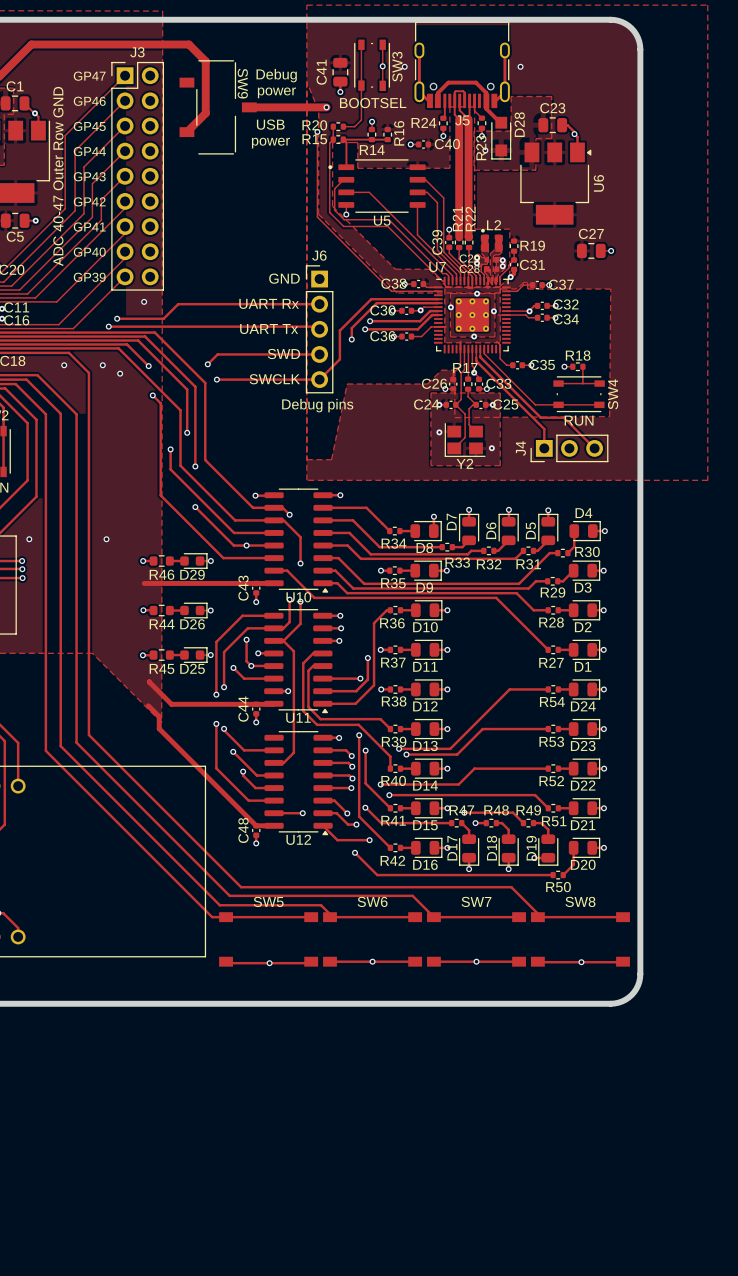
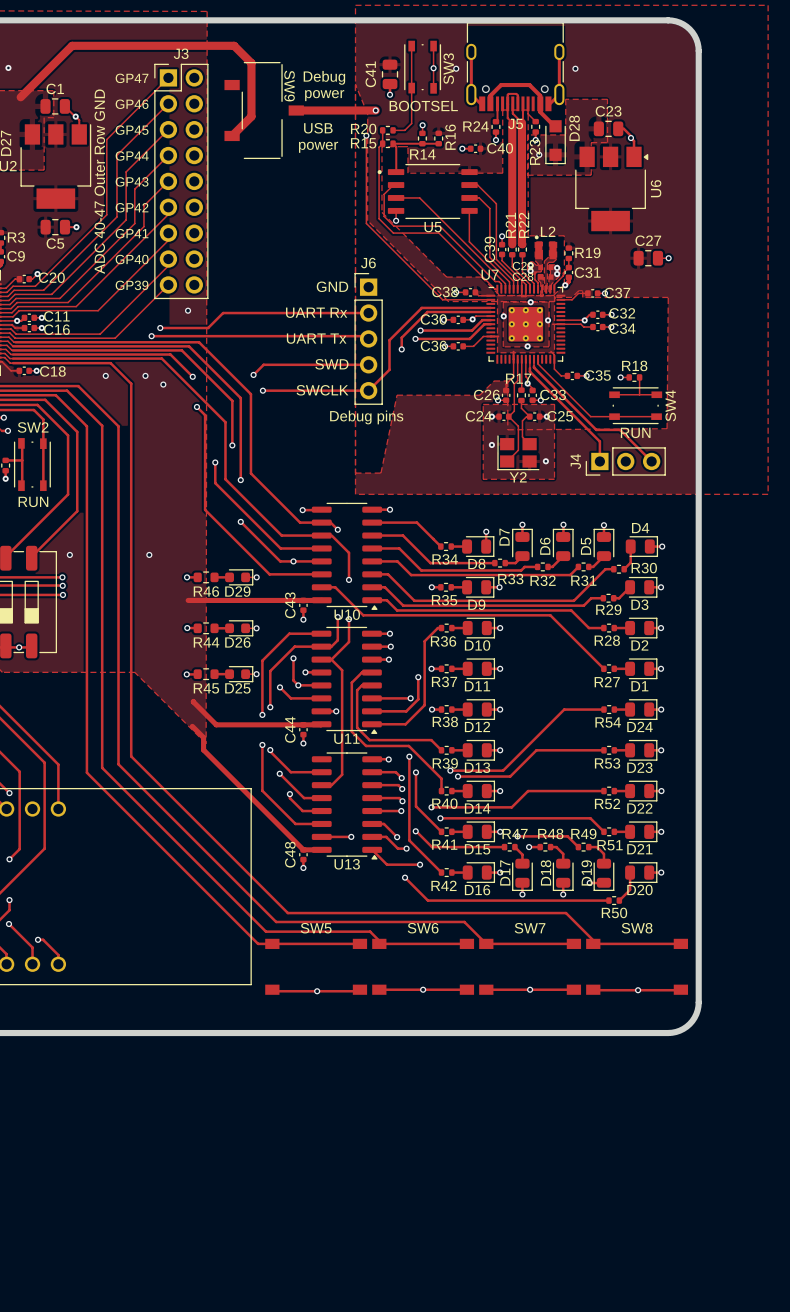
U12 name: U12 (298, 839) -> U13 (347, 864)

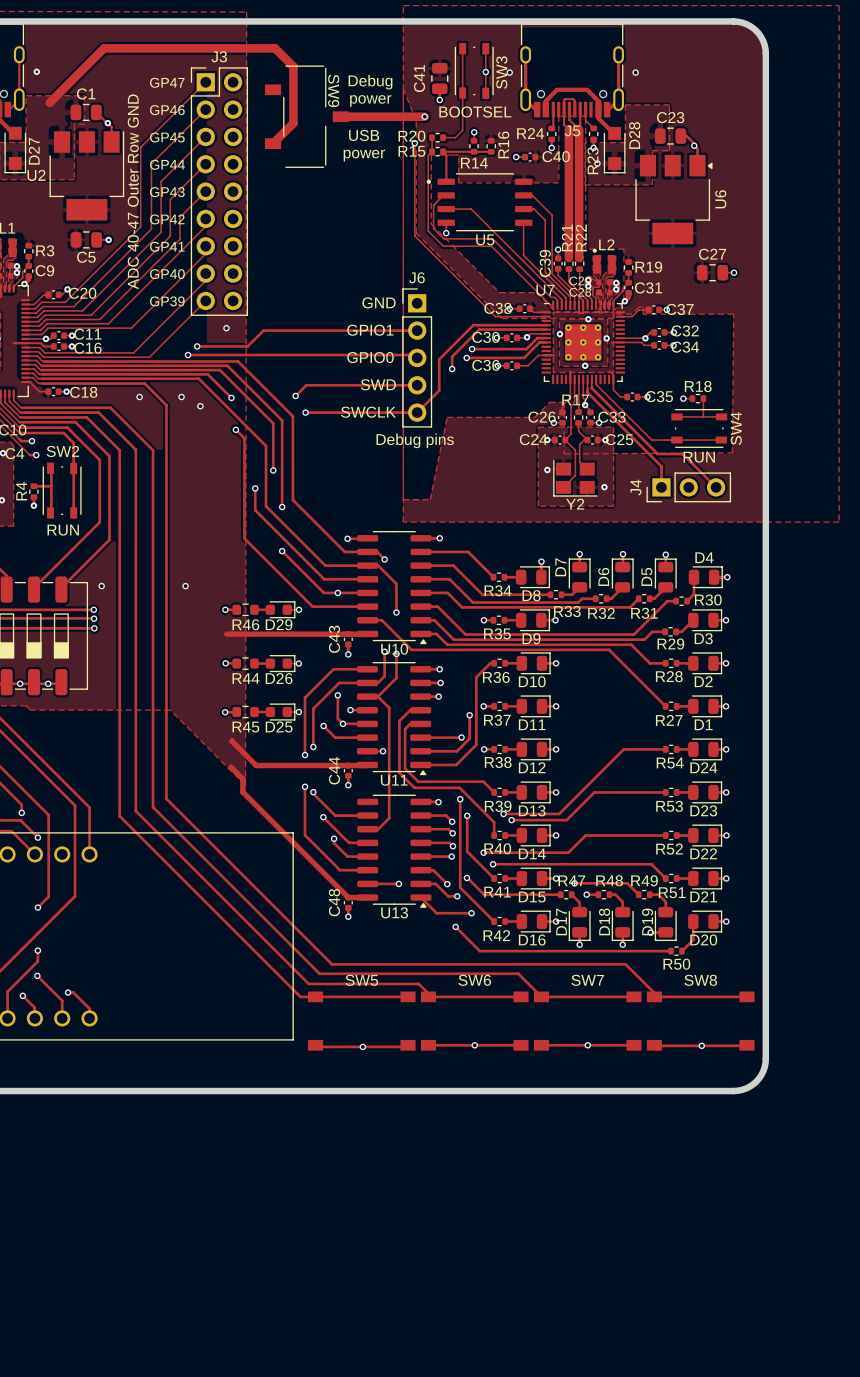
text: UART Rx (316, 312) -> GPIO1 (370, 330)
text: UART Tx (316, 338) -> GPIO0 (370, 357)

